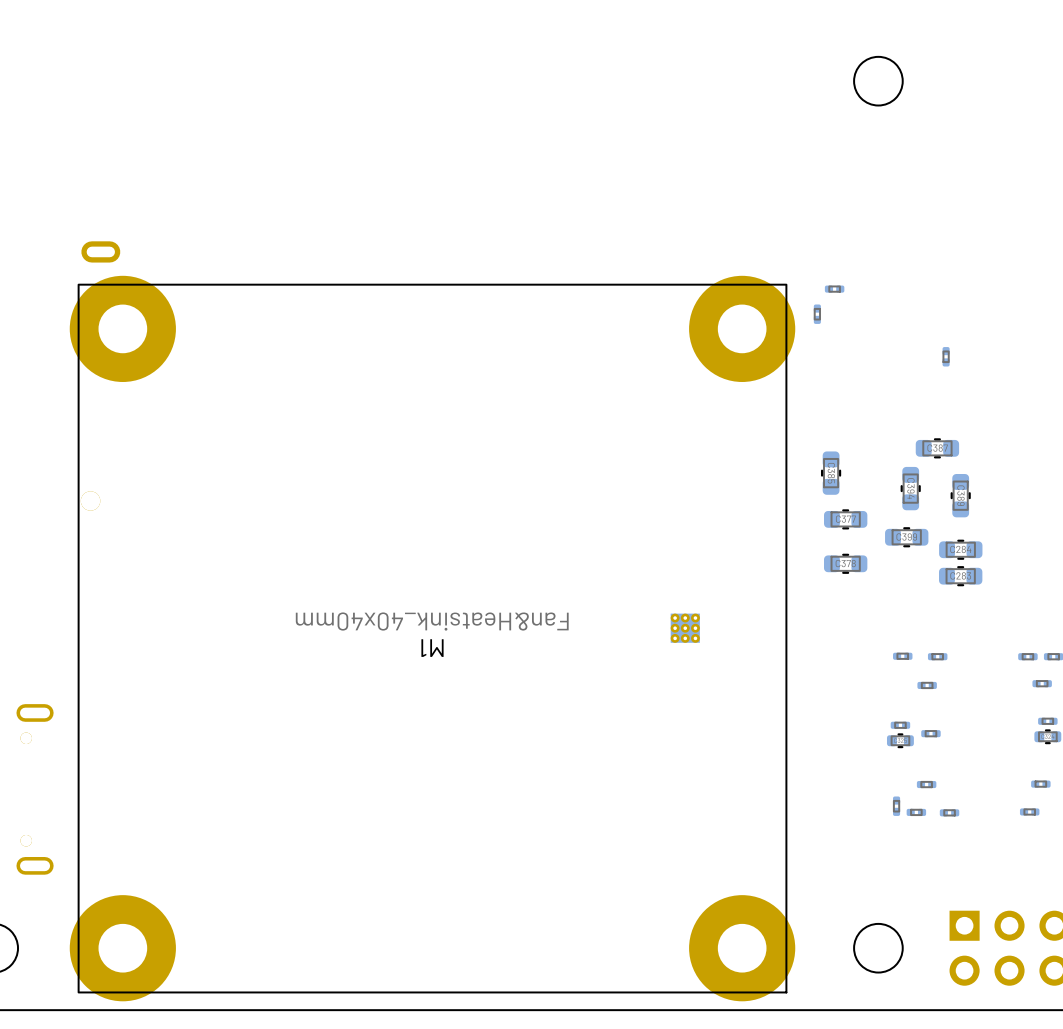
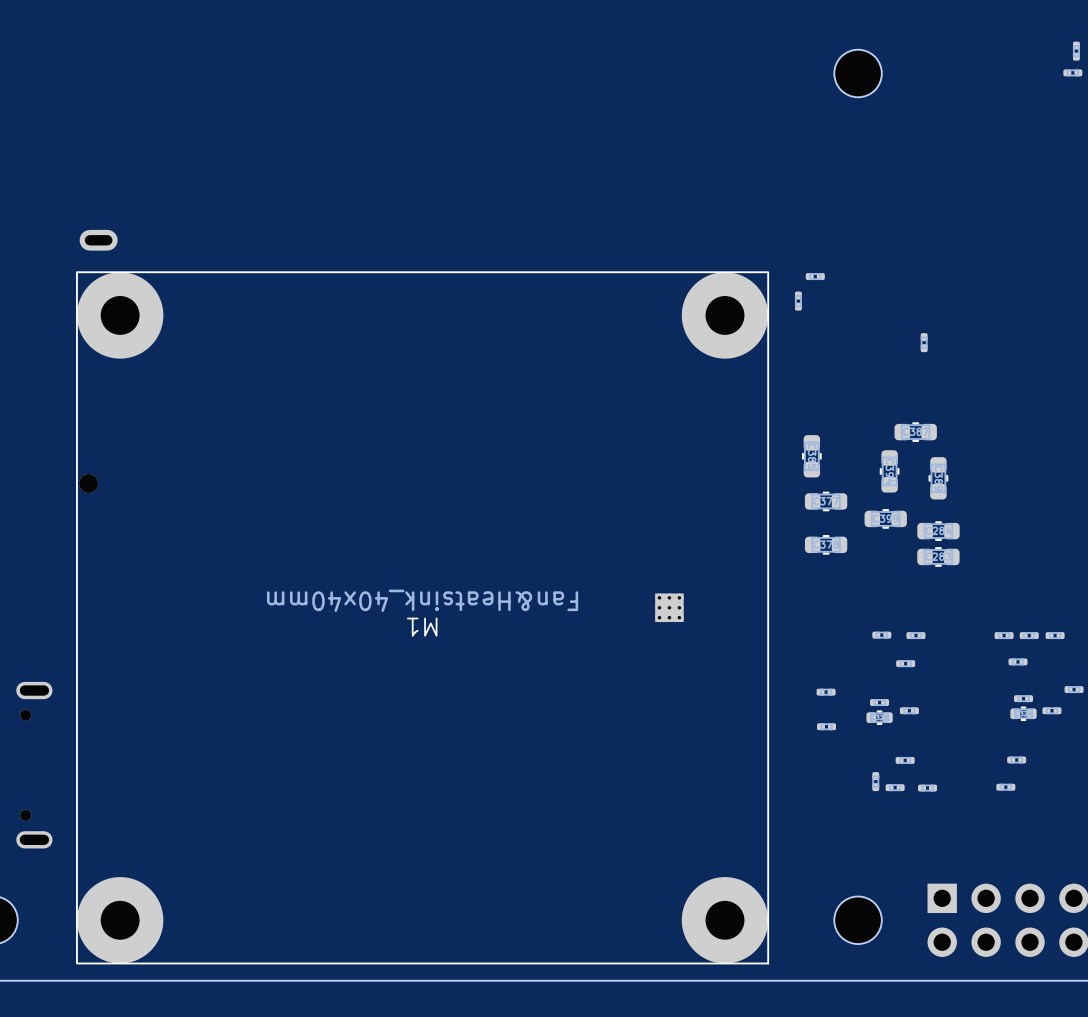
M1 footprint: [69, 275, 796, 1002] -> [76, 271, 770, 965]
part: none -> (826, 692)
part: none -> (826, 726)

